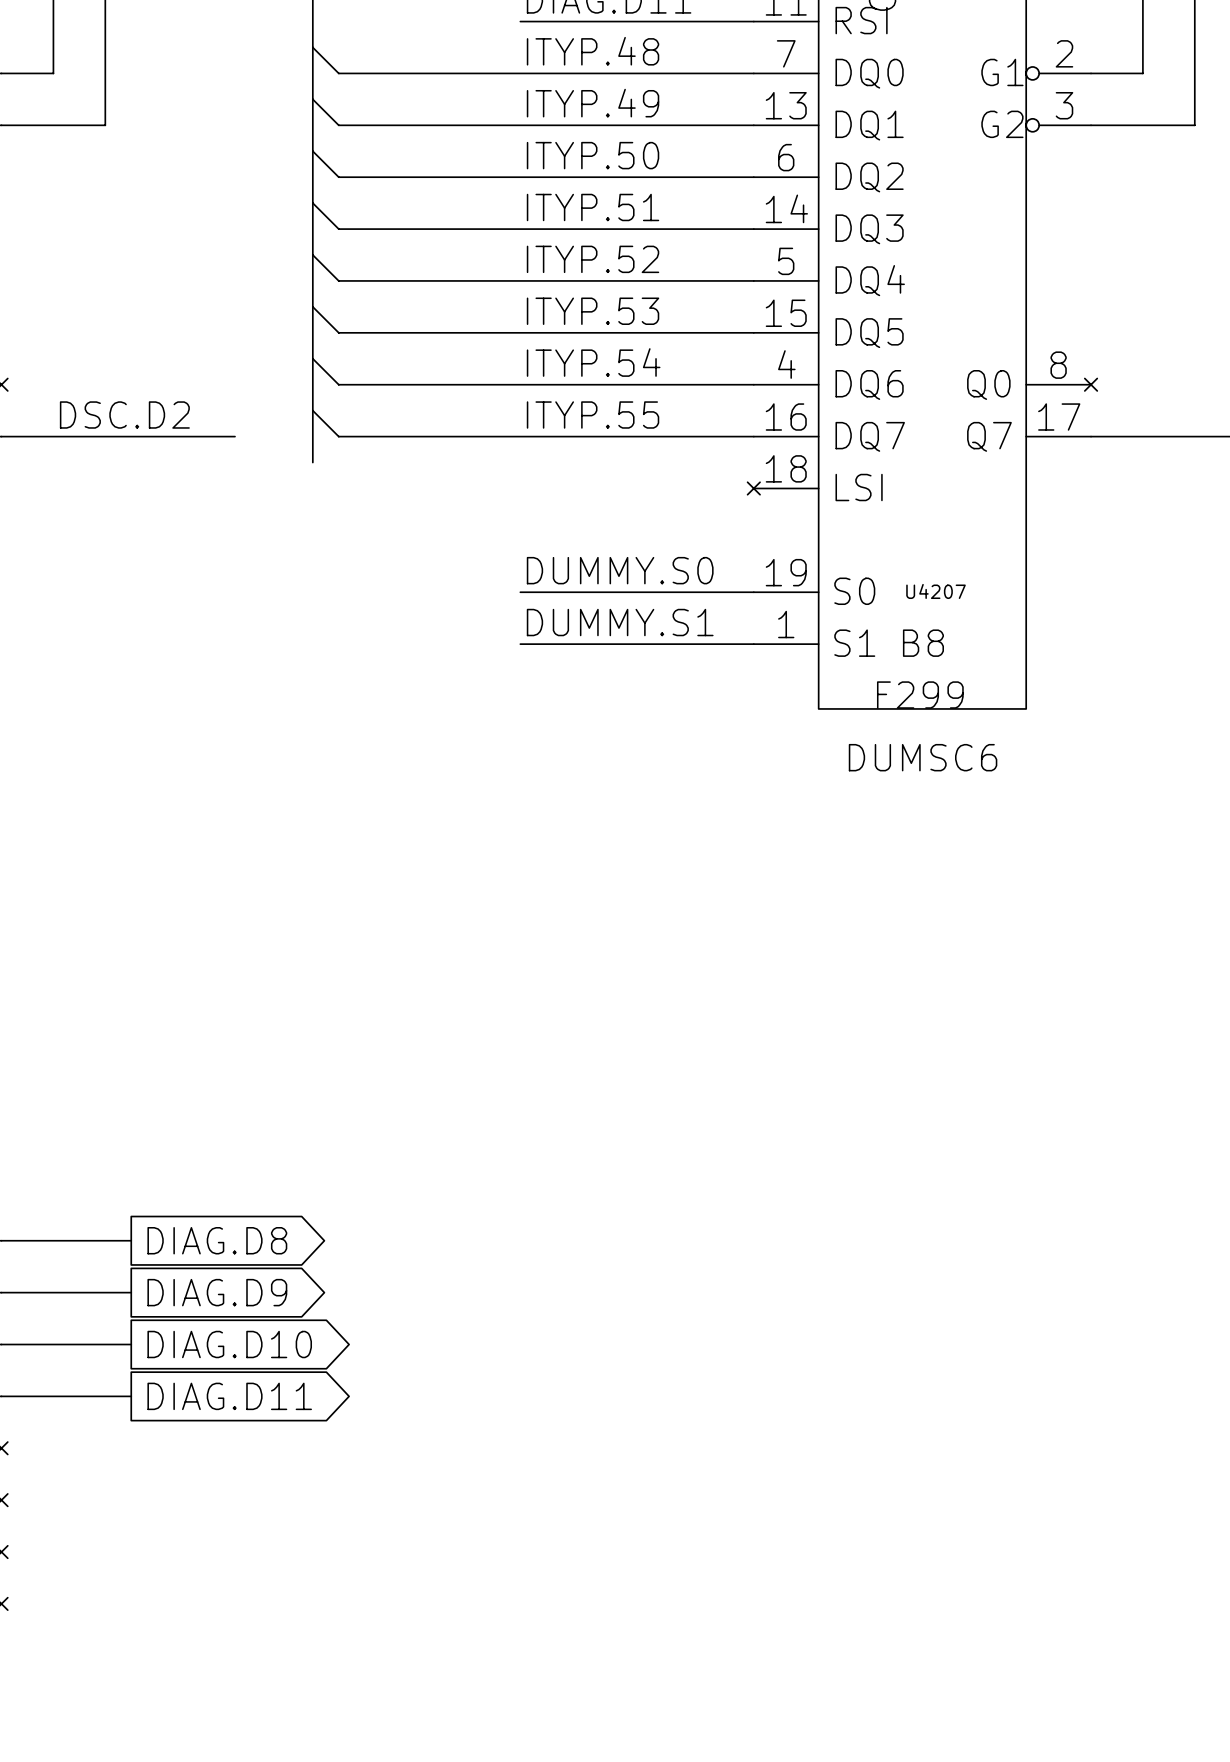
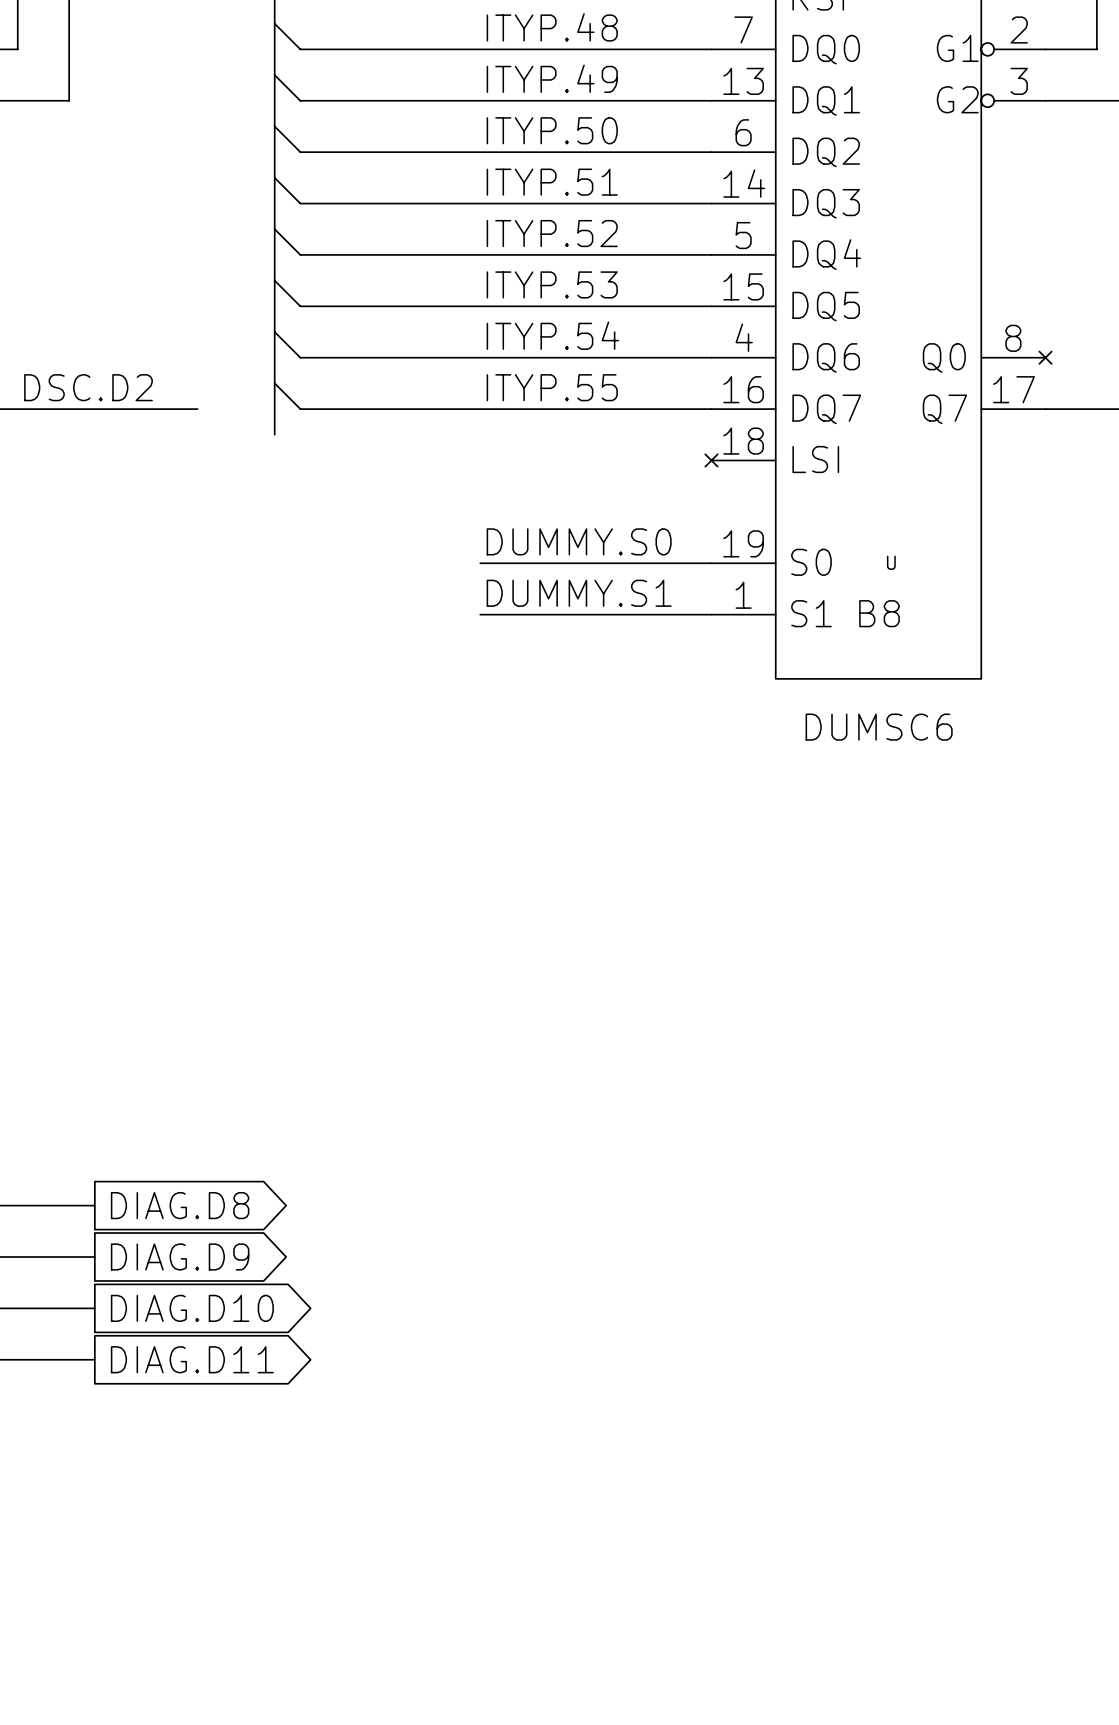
U4207 name: U4207 (936, 591) -> U (891, 562)
U4207 value: F299 (920, 695) -> none

